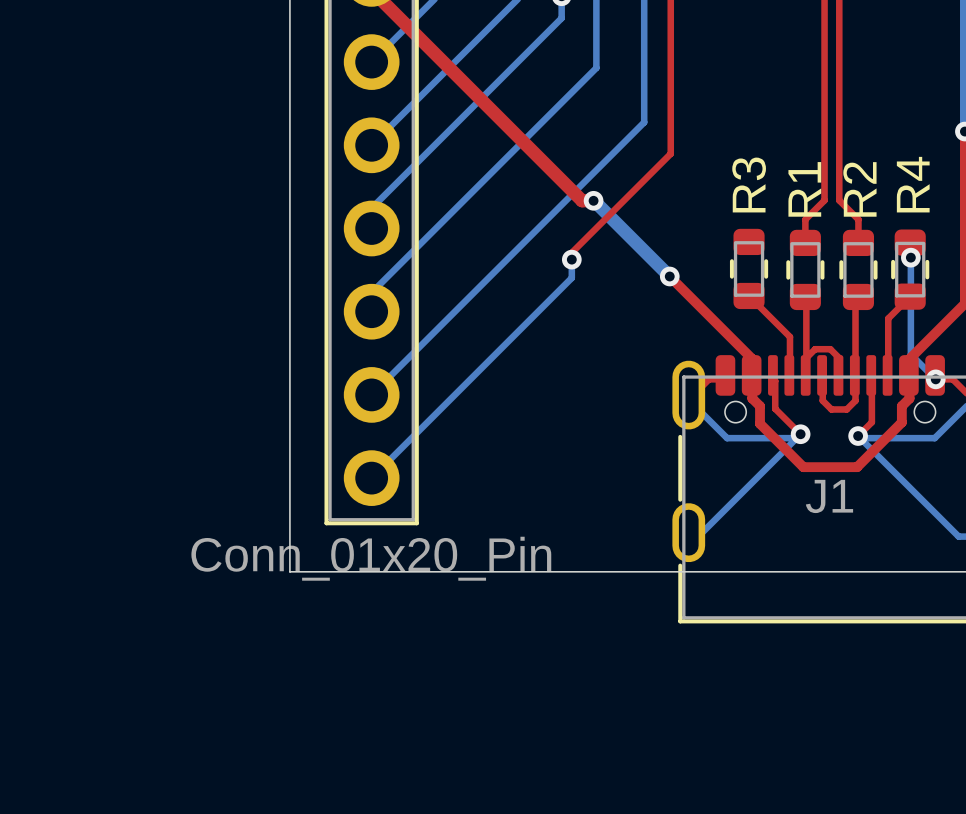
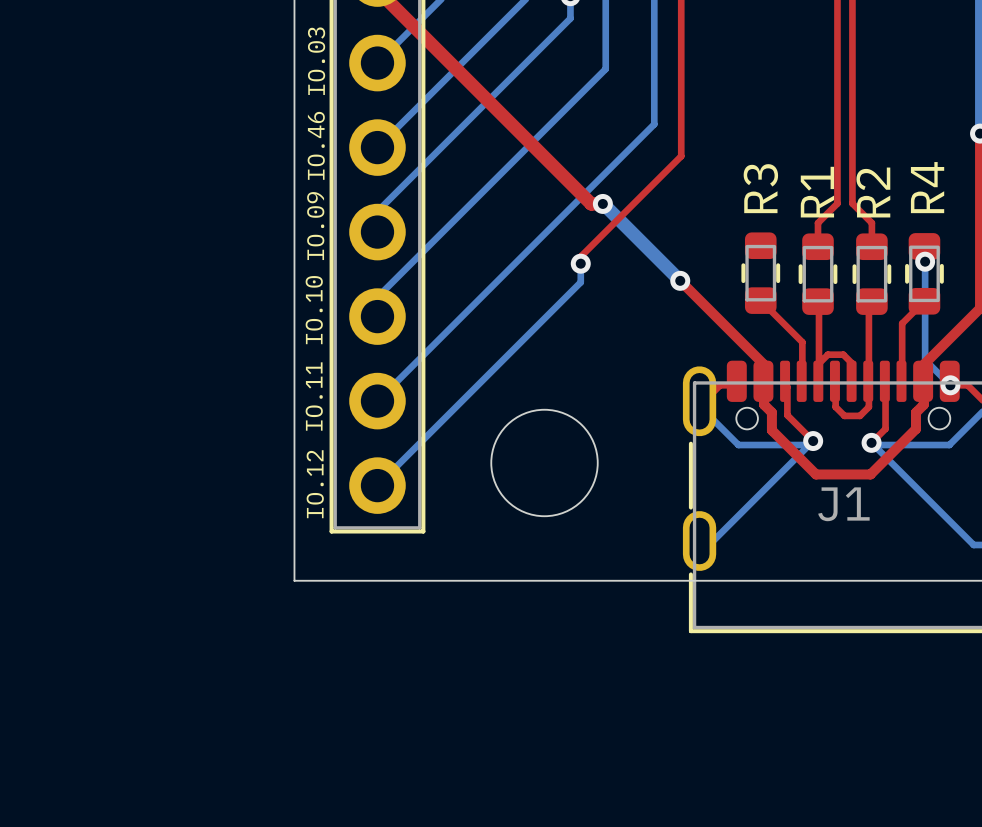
text: none -> IO.03 (316, 61)
text: none -> IO.46 (316, 145)
text: none -> IO.09 (315, 226)
text: none -> IO.10 (314, 310)
text: none -> IO.11 (314, 396)
round board edge: none -> [490, 408, 599, 518]
text: none -> IO.12 (315, 484)
part value: Conn_01x20_Pin (371, 558) -> none

